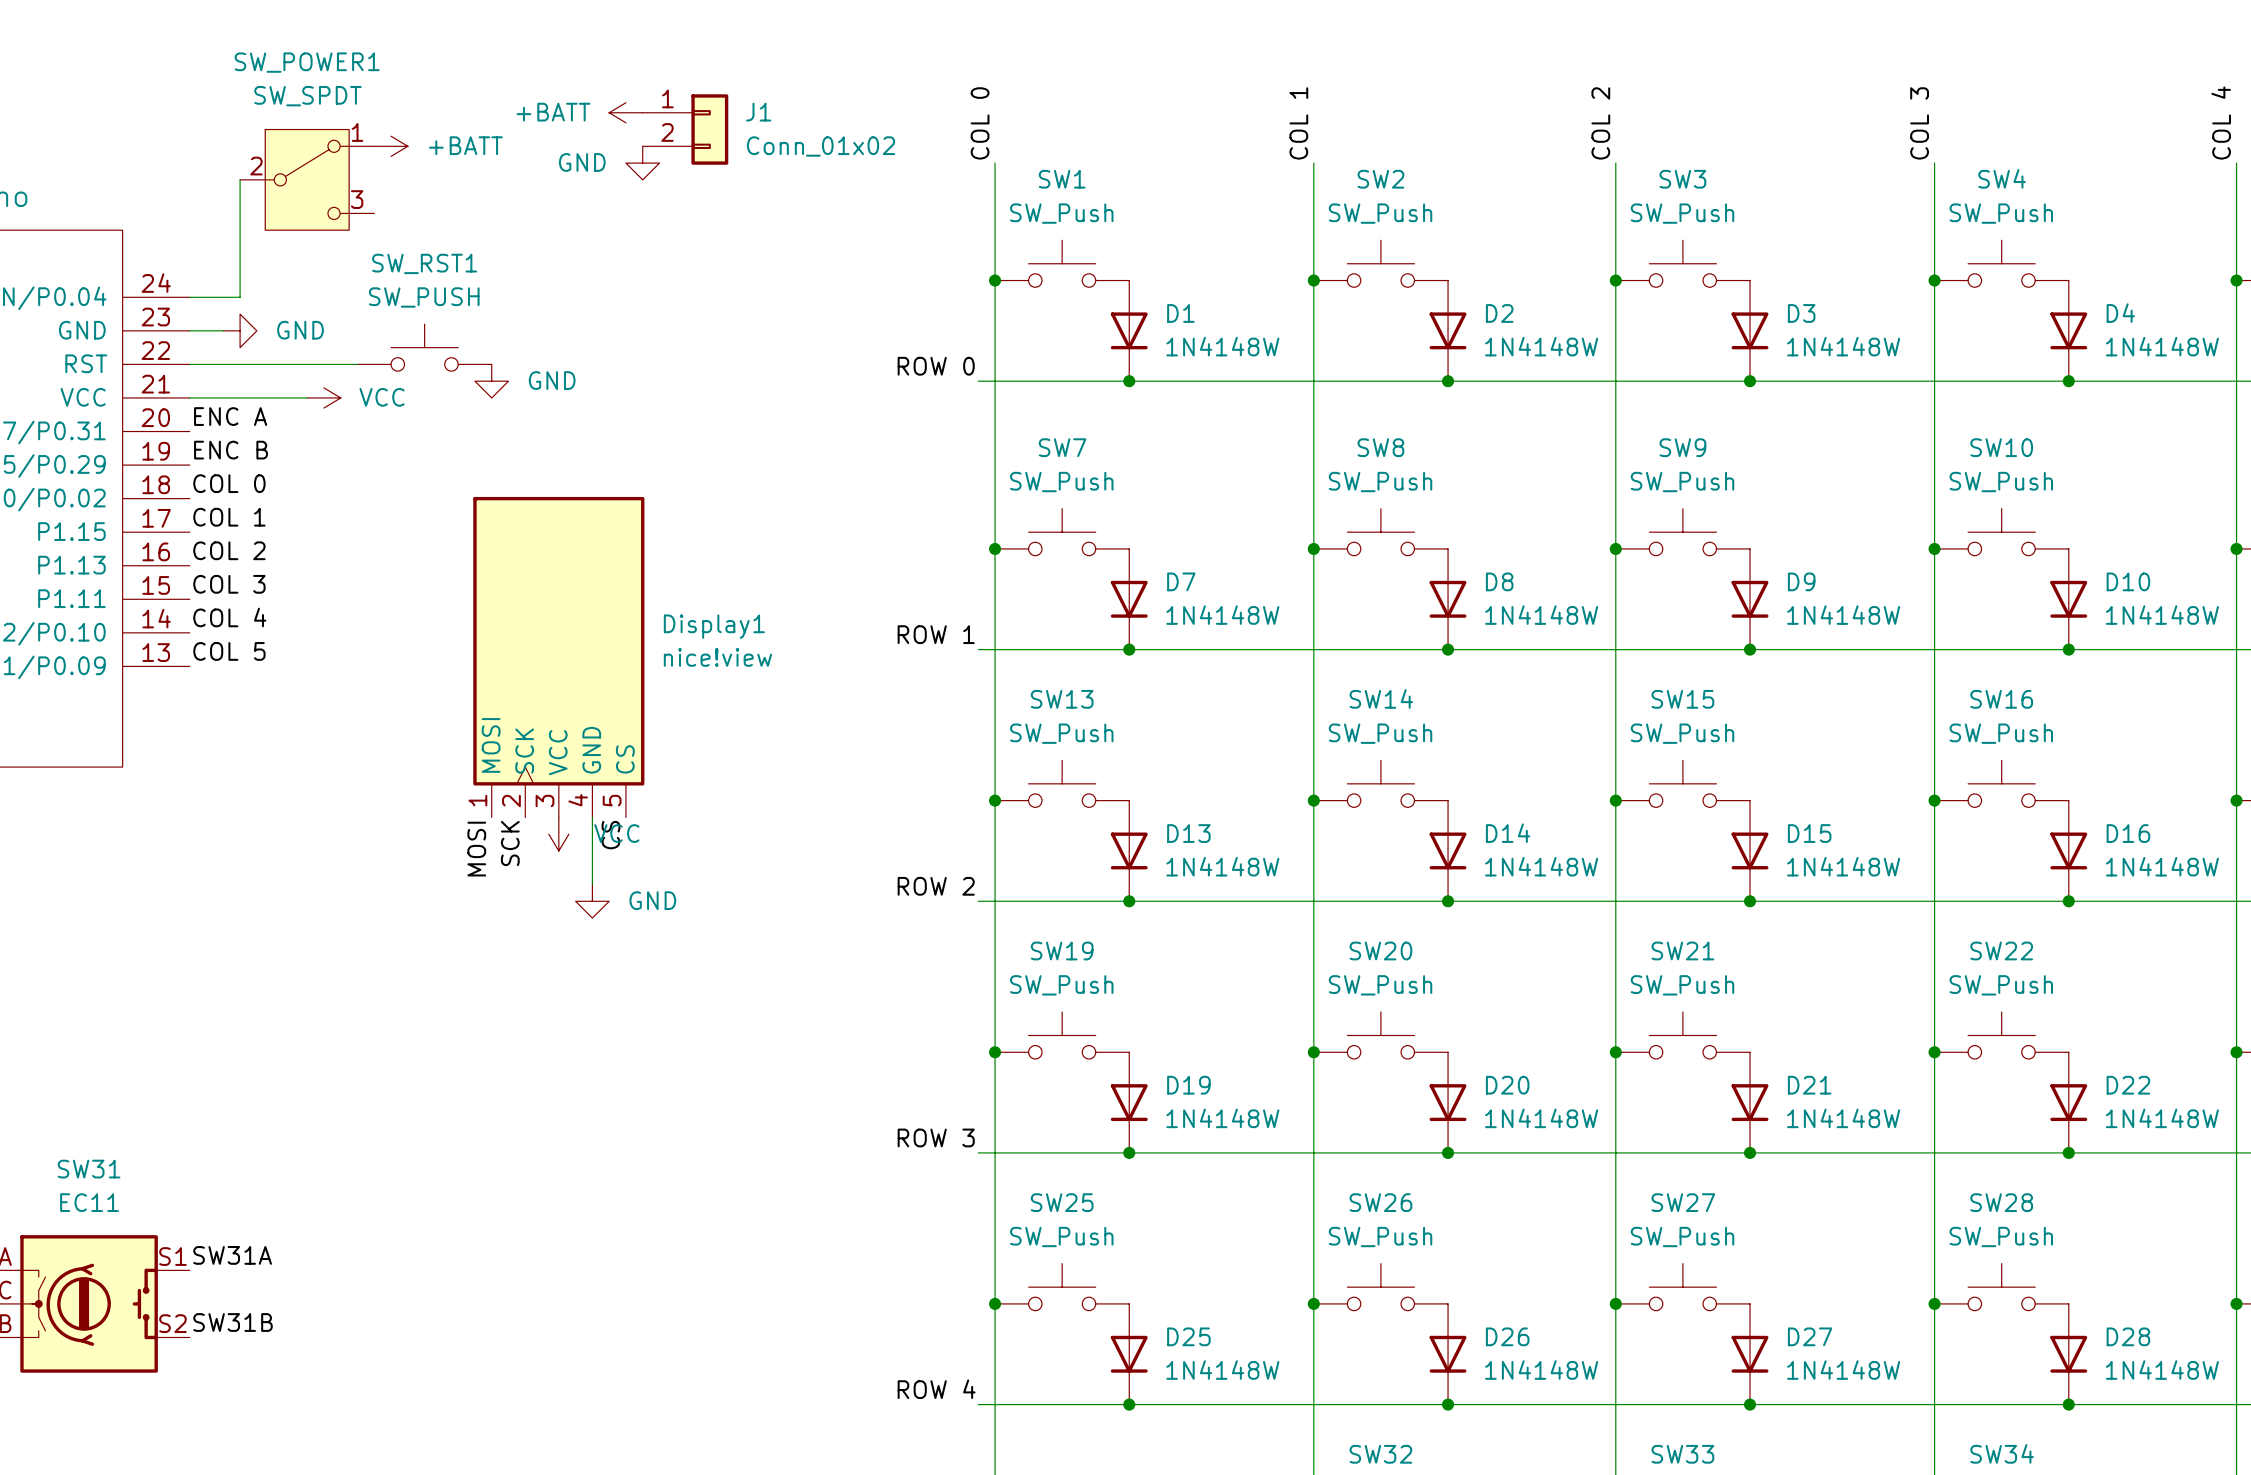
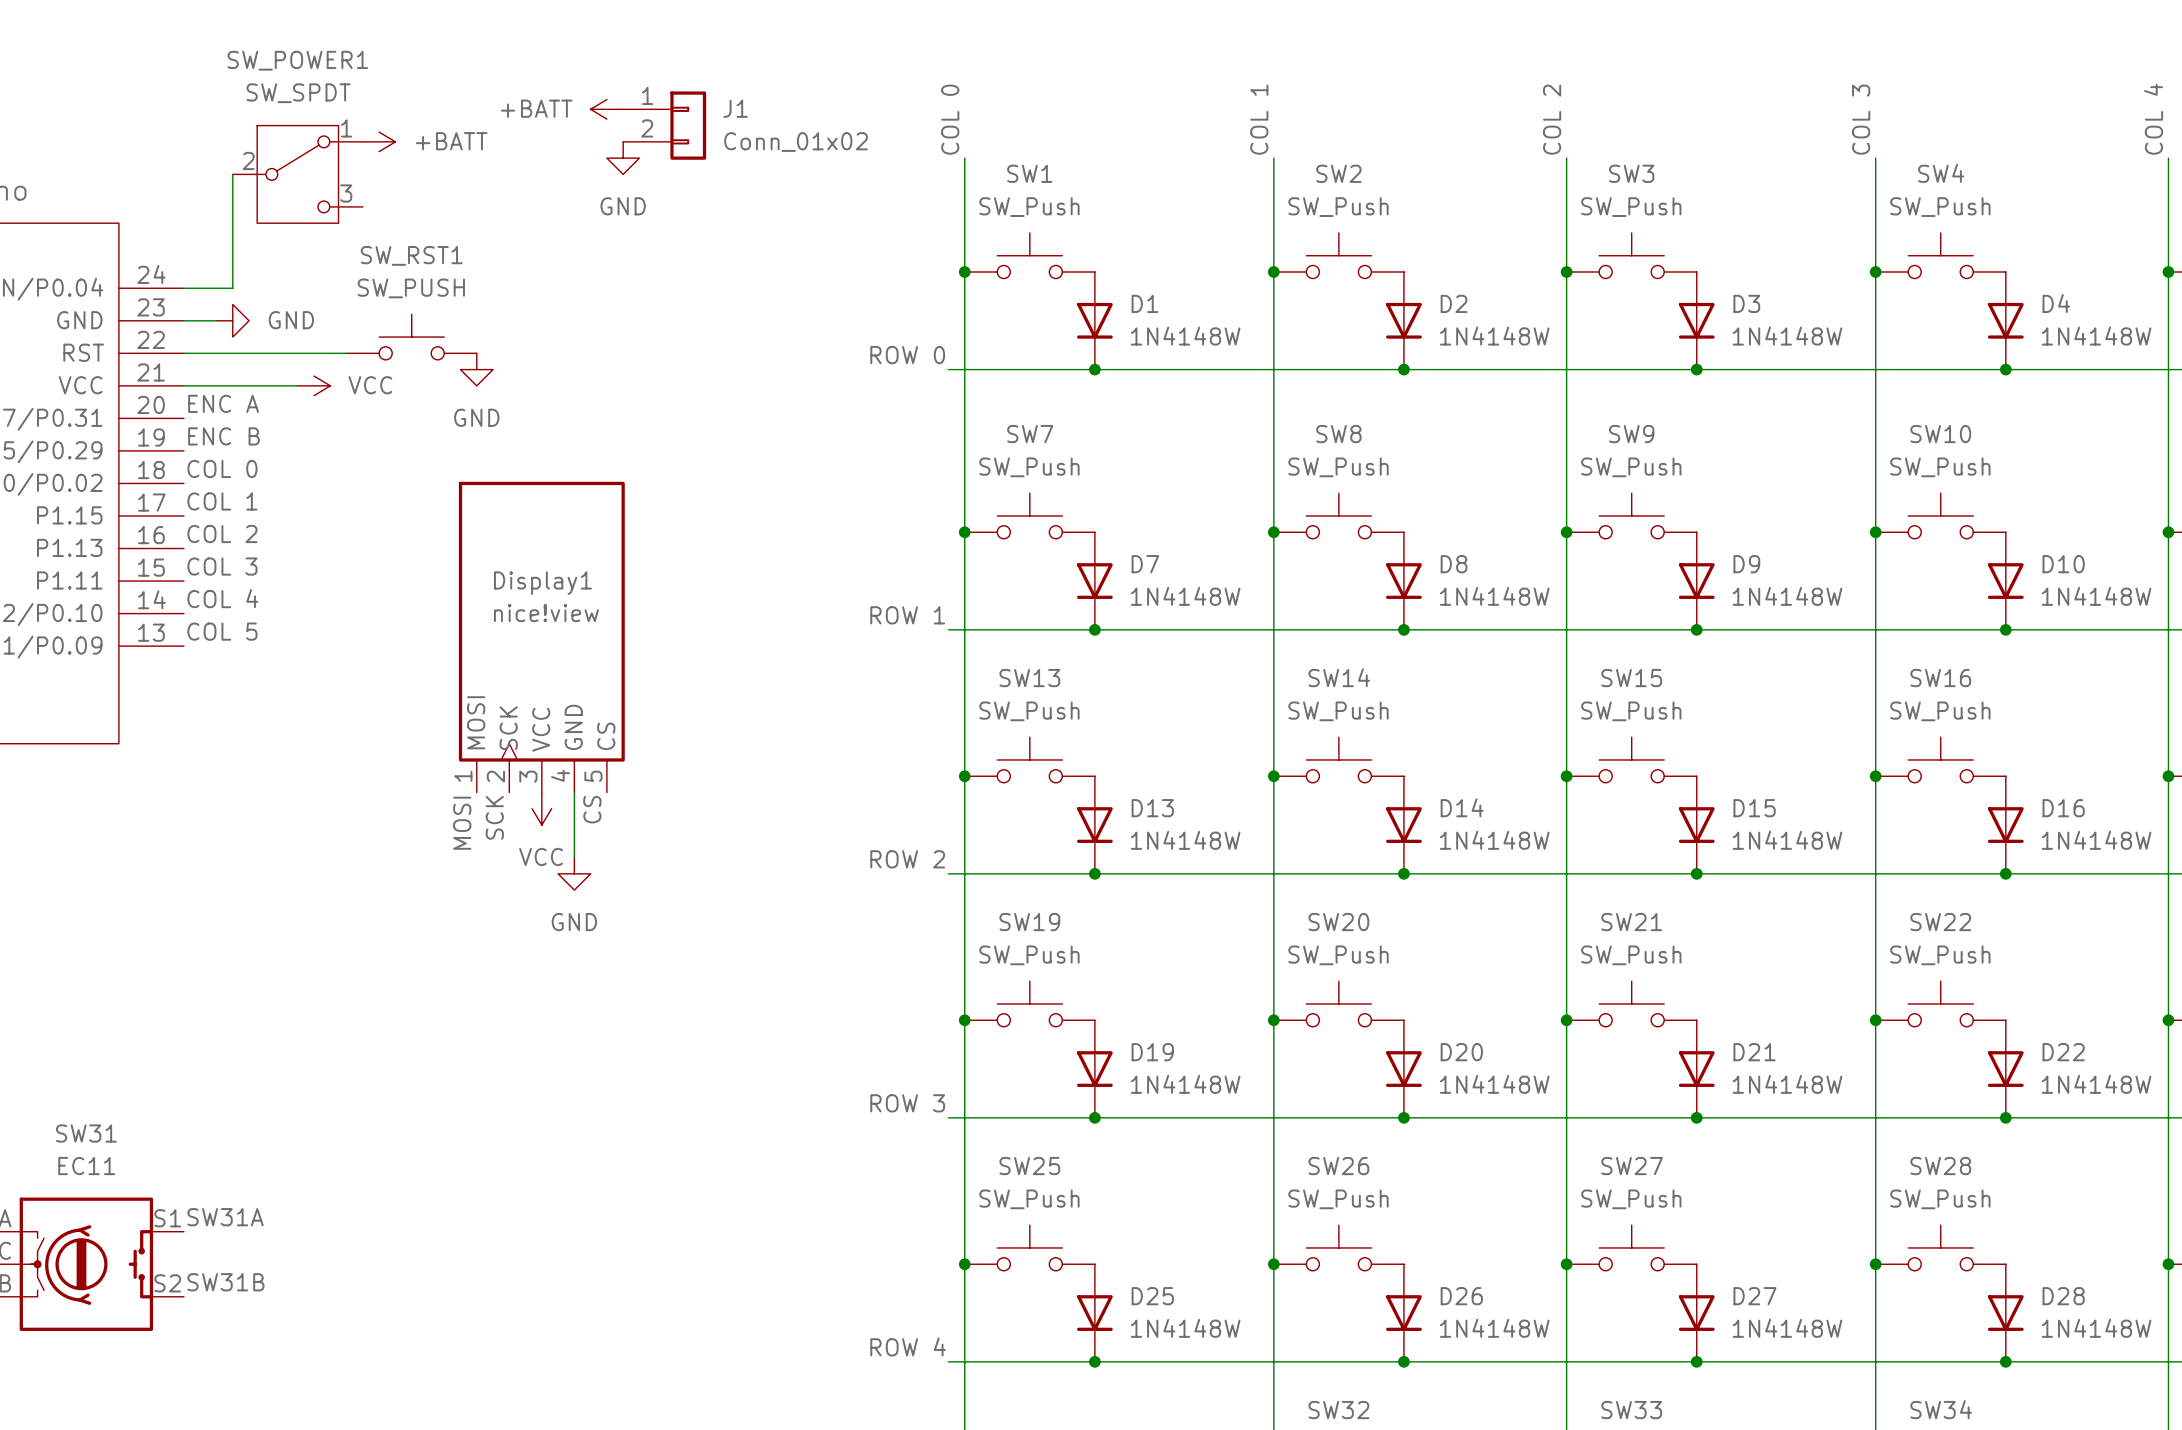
power symbol text position: GND (582, 162) -> GND (623, 206)
power symbol text position: GND (552, 380) -> GND (476, 417)
Display1 name position: Display1 (714, 626) -> Display1 (542, 583)
Display1 value position: nice!view (717, 657) -> nice!view (546, 612)
power symbol text position: VCC (616, 833) -> VCC (541, 856)
power symbol text position: GND (652, 900) -> GND (574, 922)

